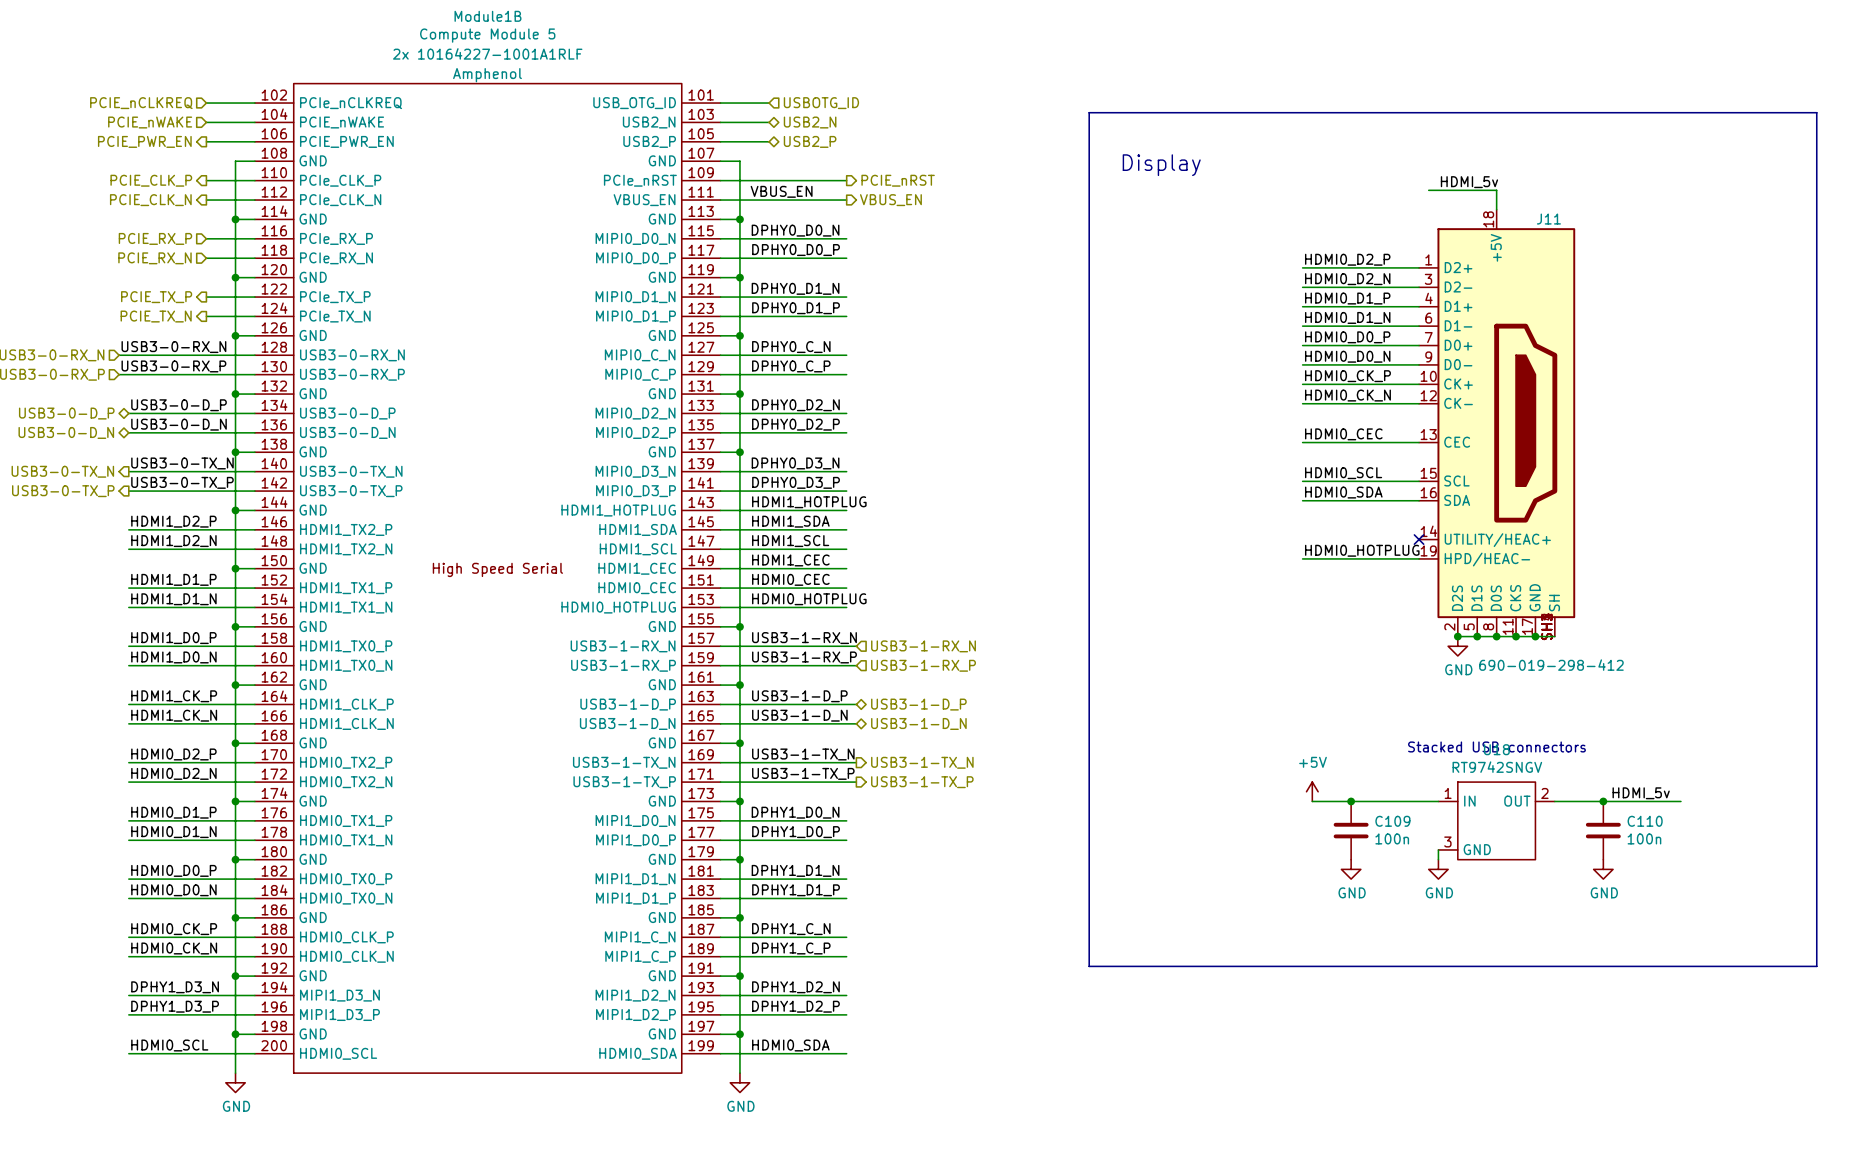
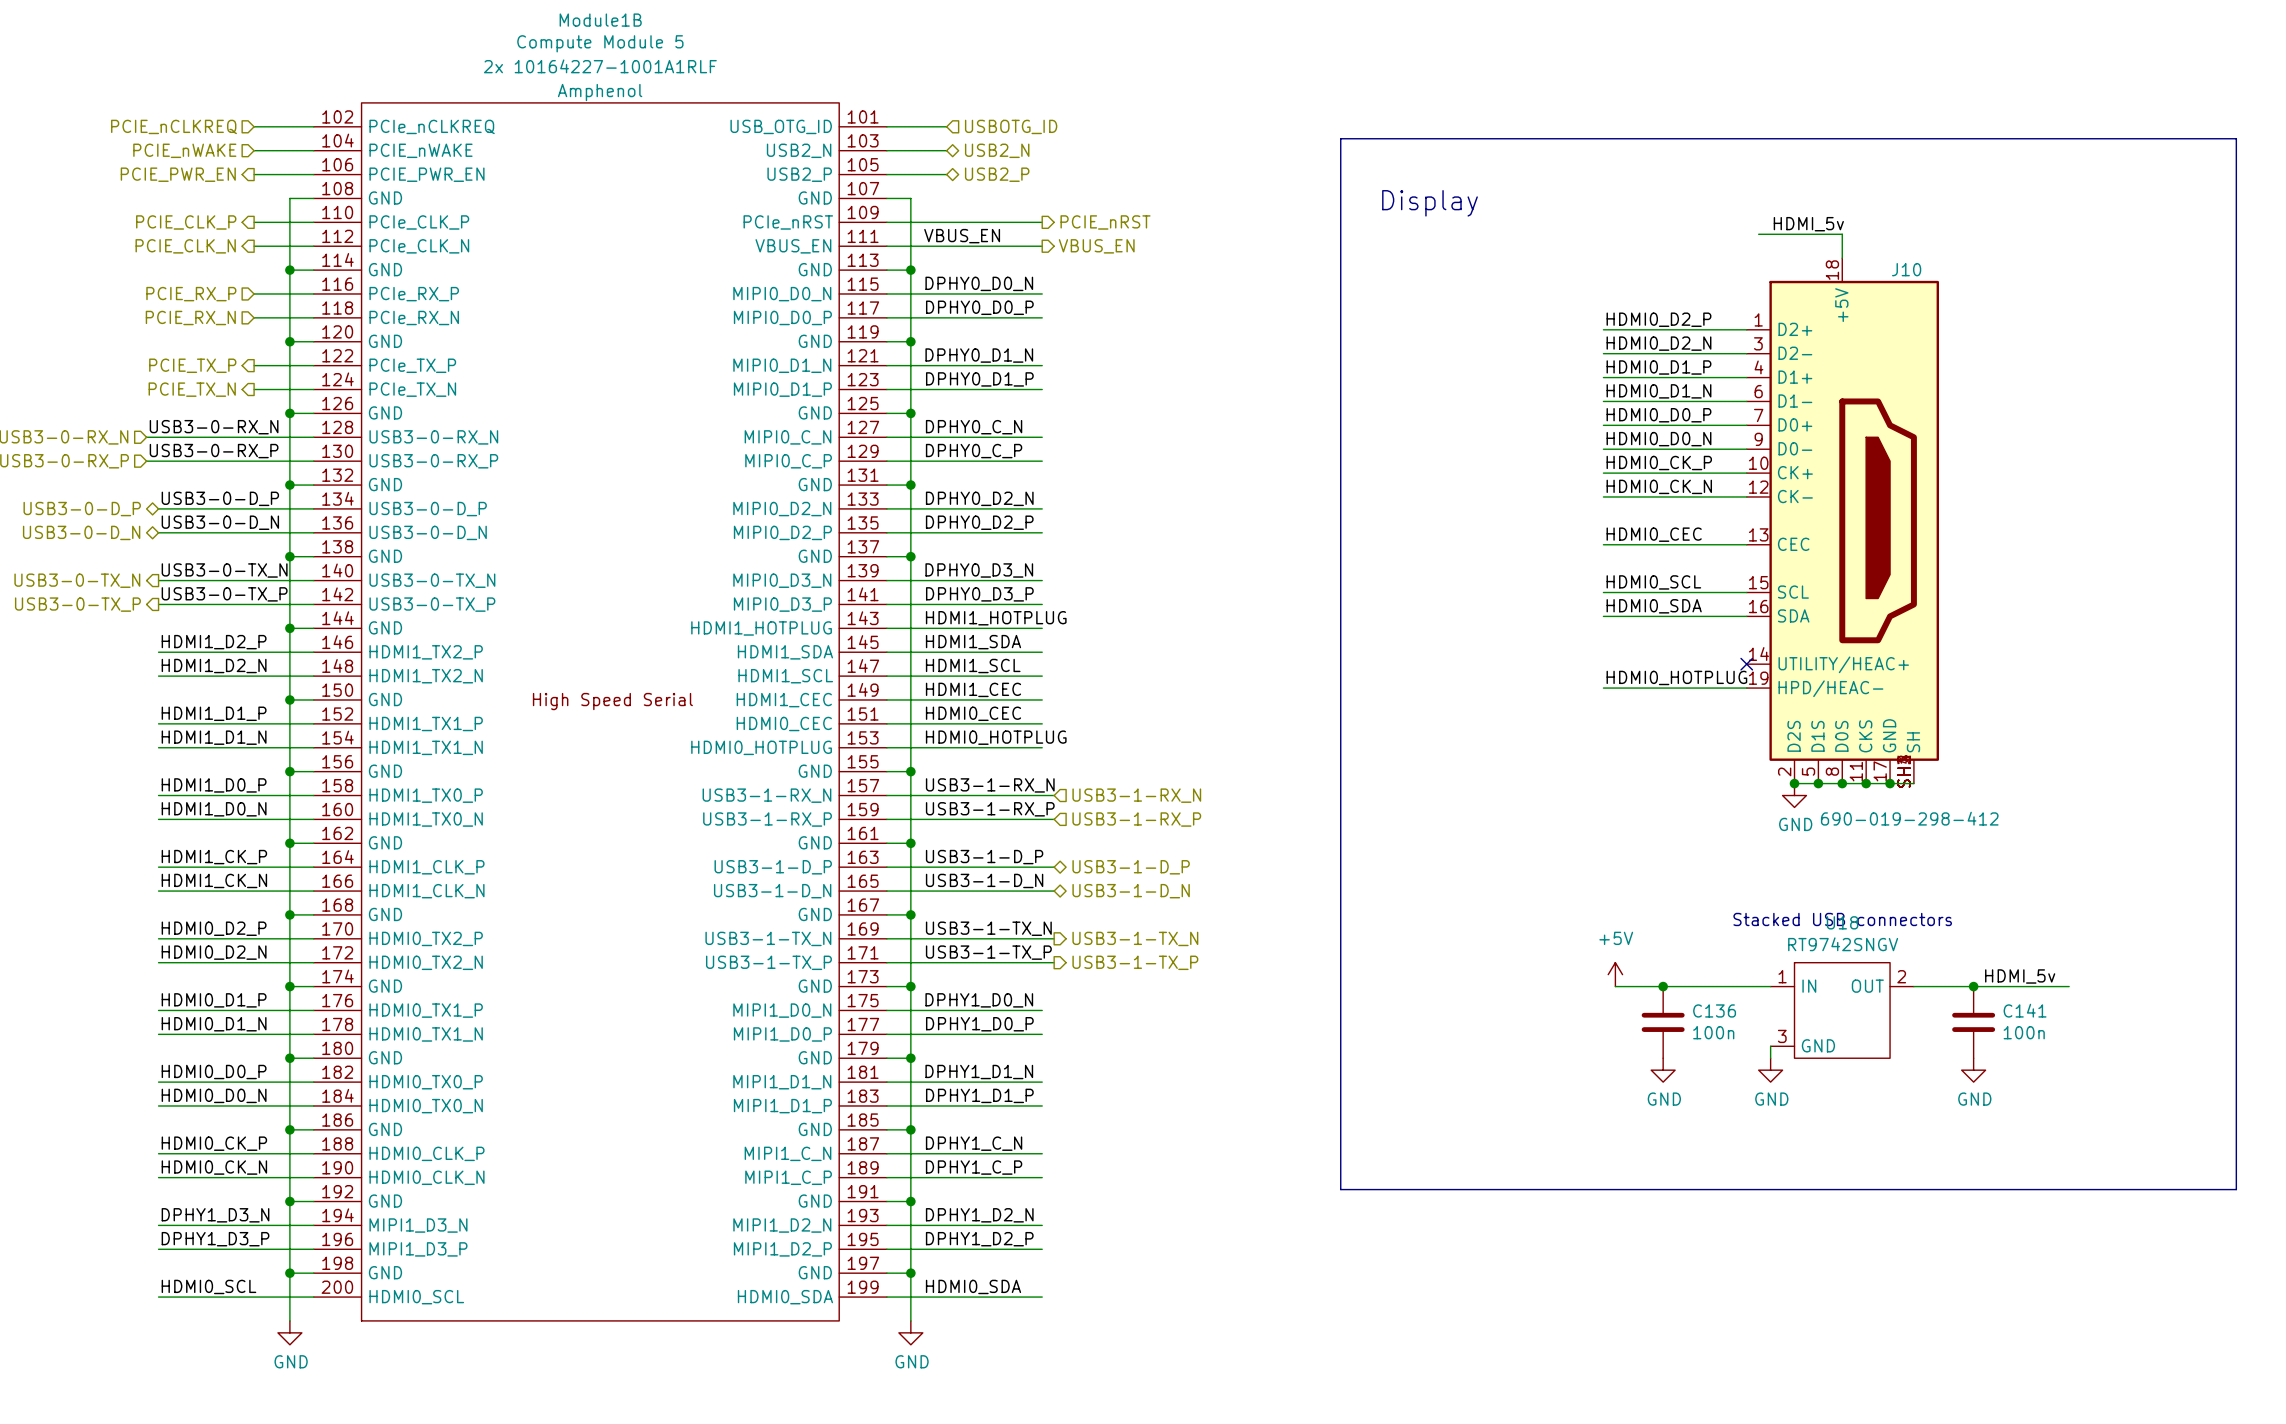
J11 name: J11 (1548, 219) -> J10 (1906, 269)
C109 name: C109 (1392, 821) -> C136 (1714, 1010)
C110 name: C110 (1645, 821) -> C141 (2025, 1010)

